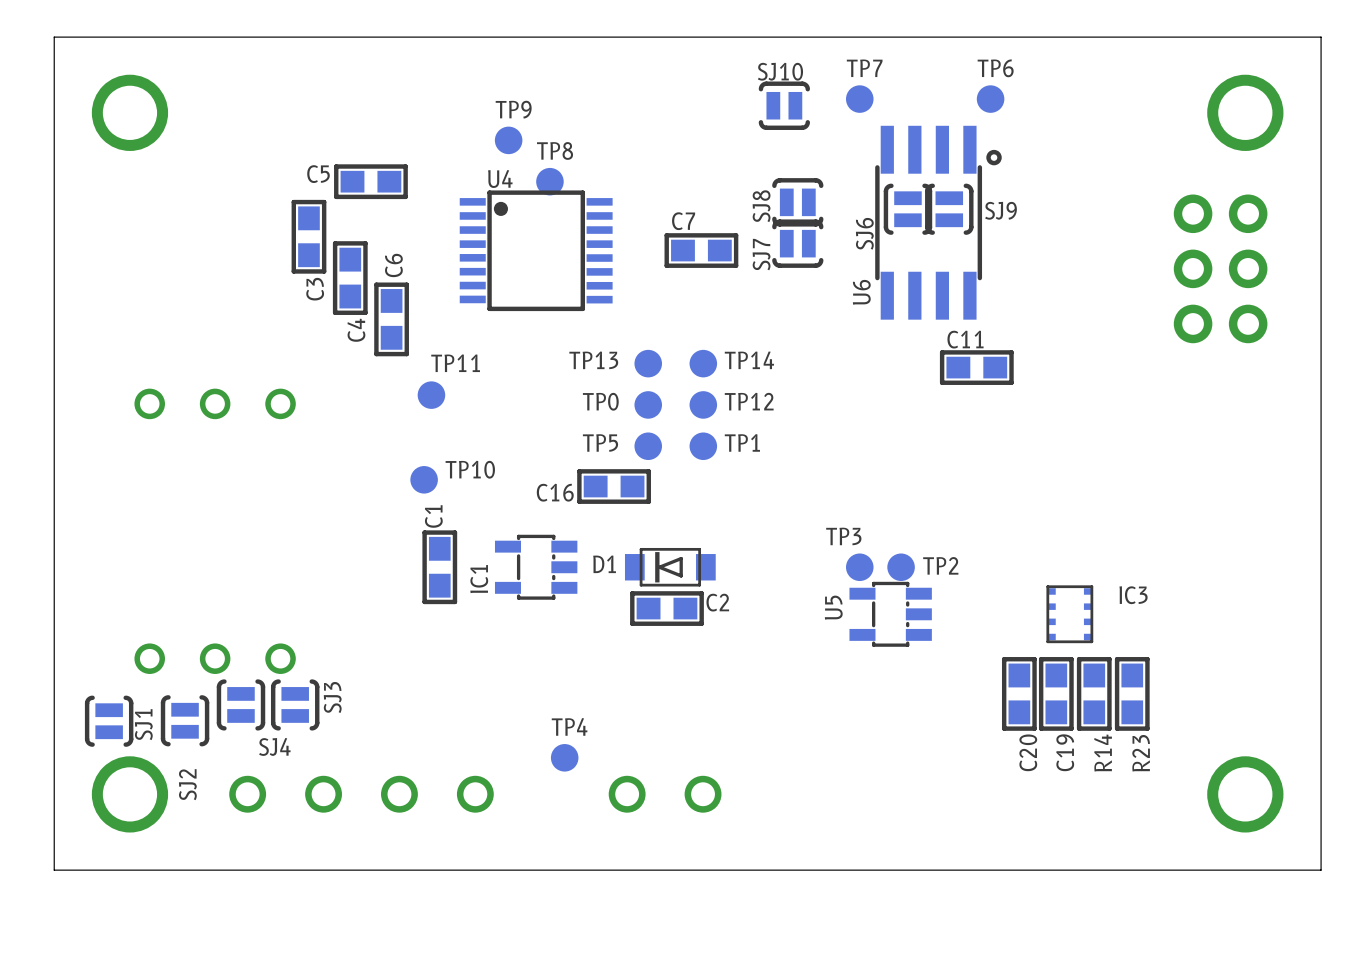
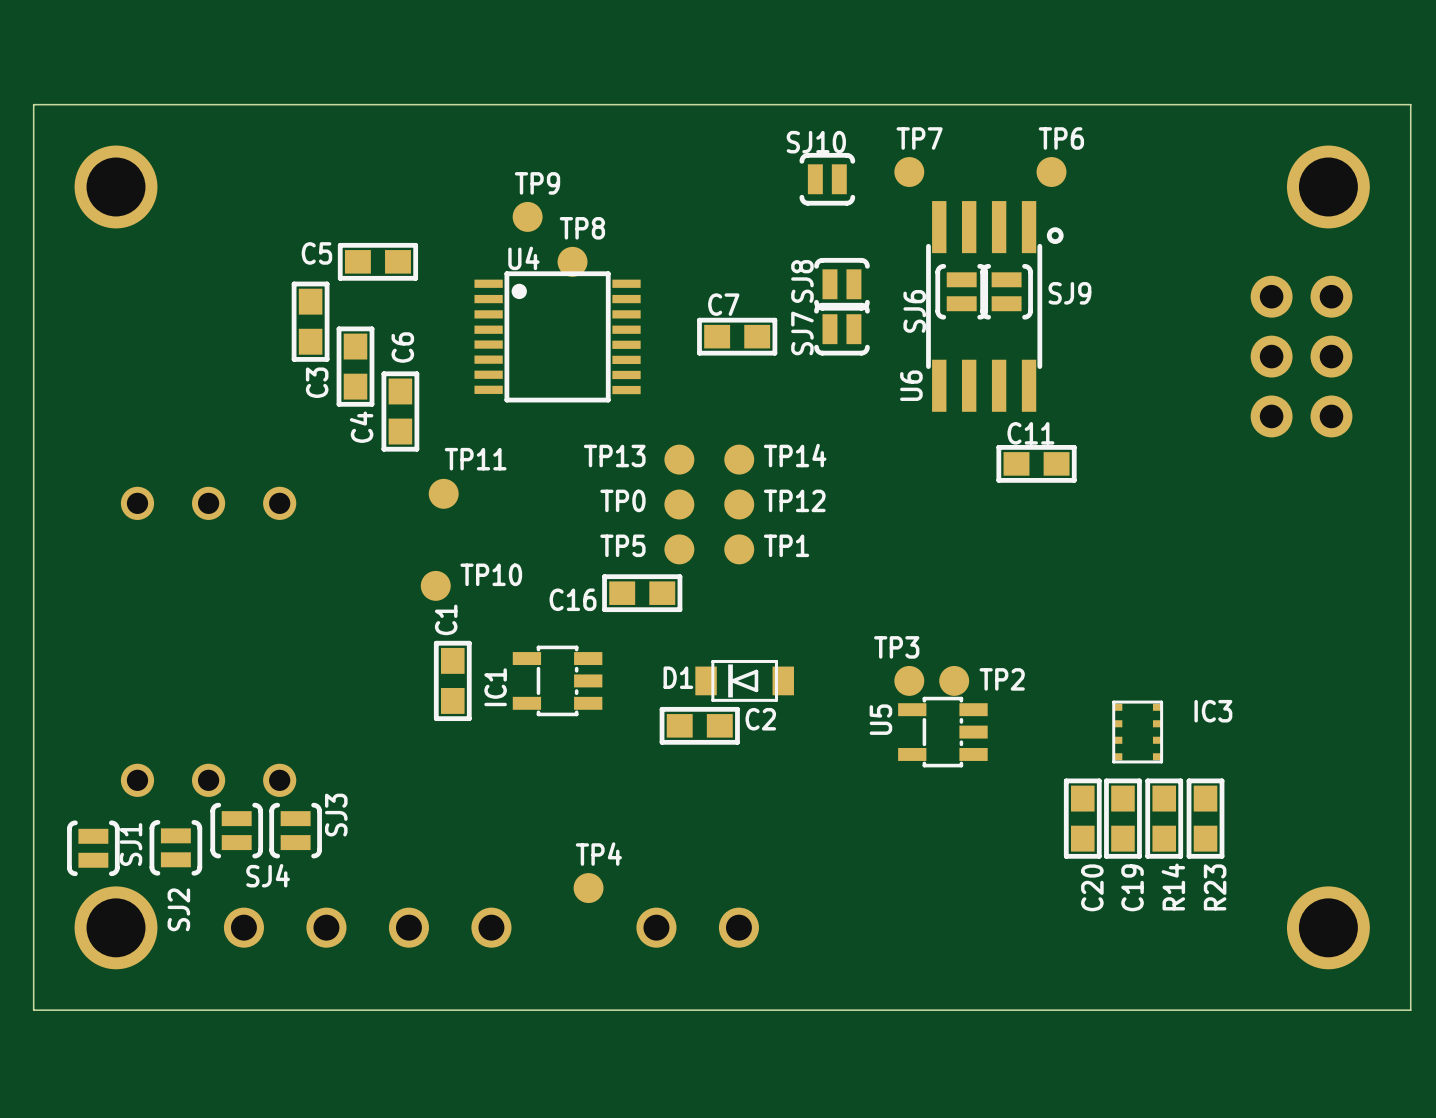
D1 position: (670, 567) -> (744, 680)

